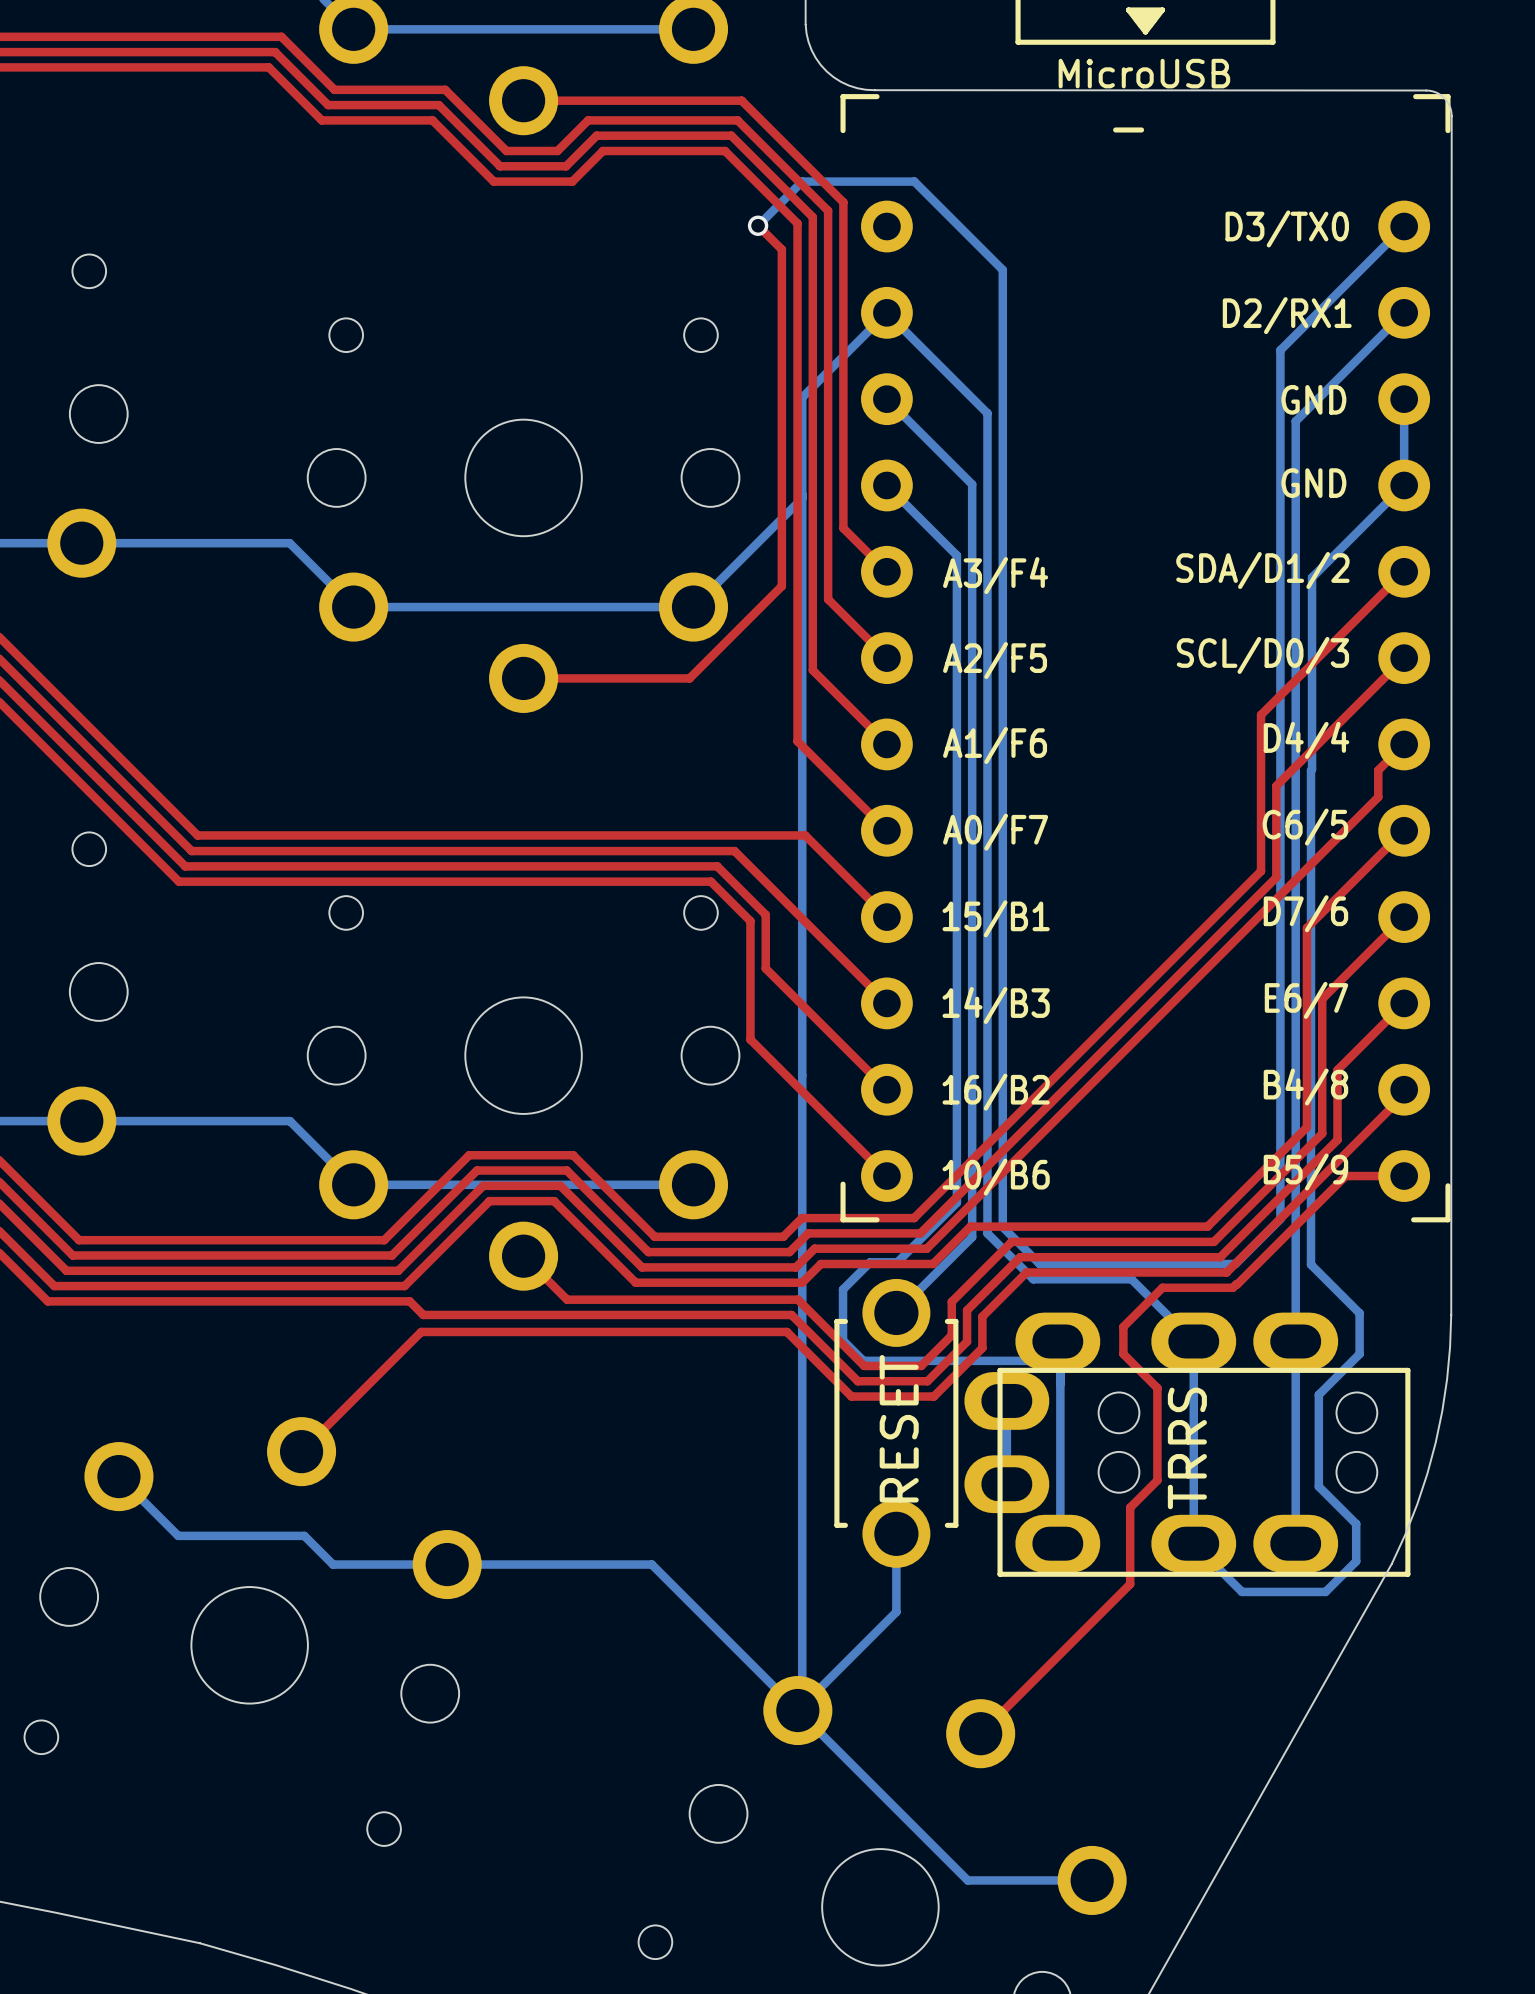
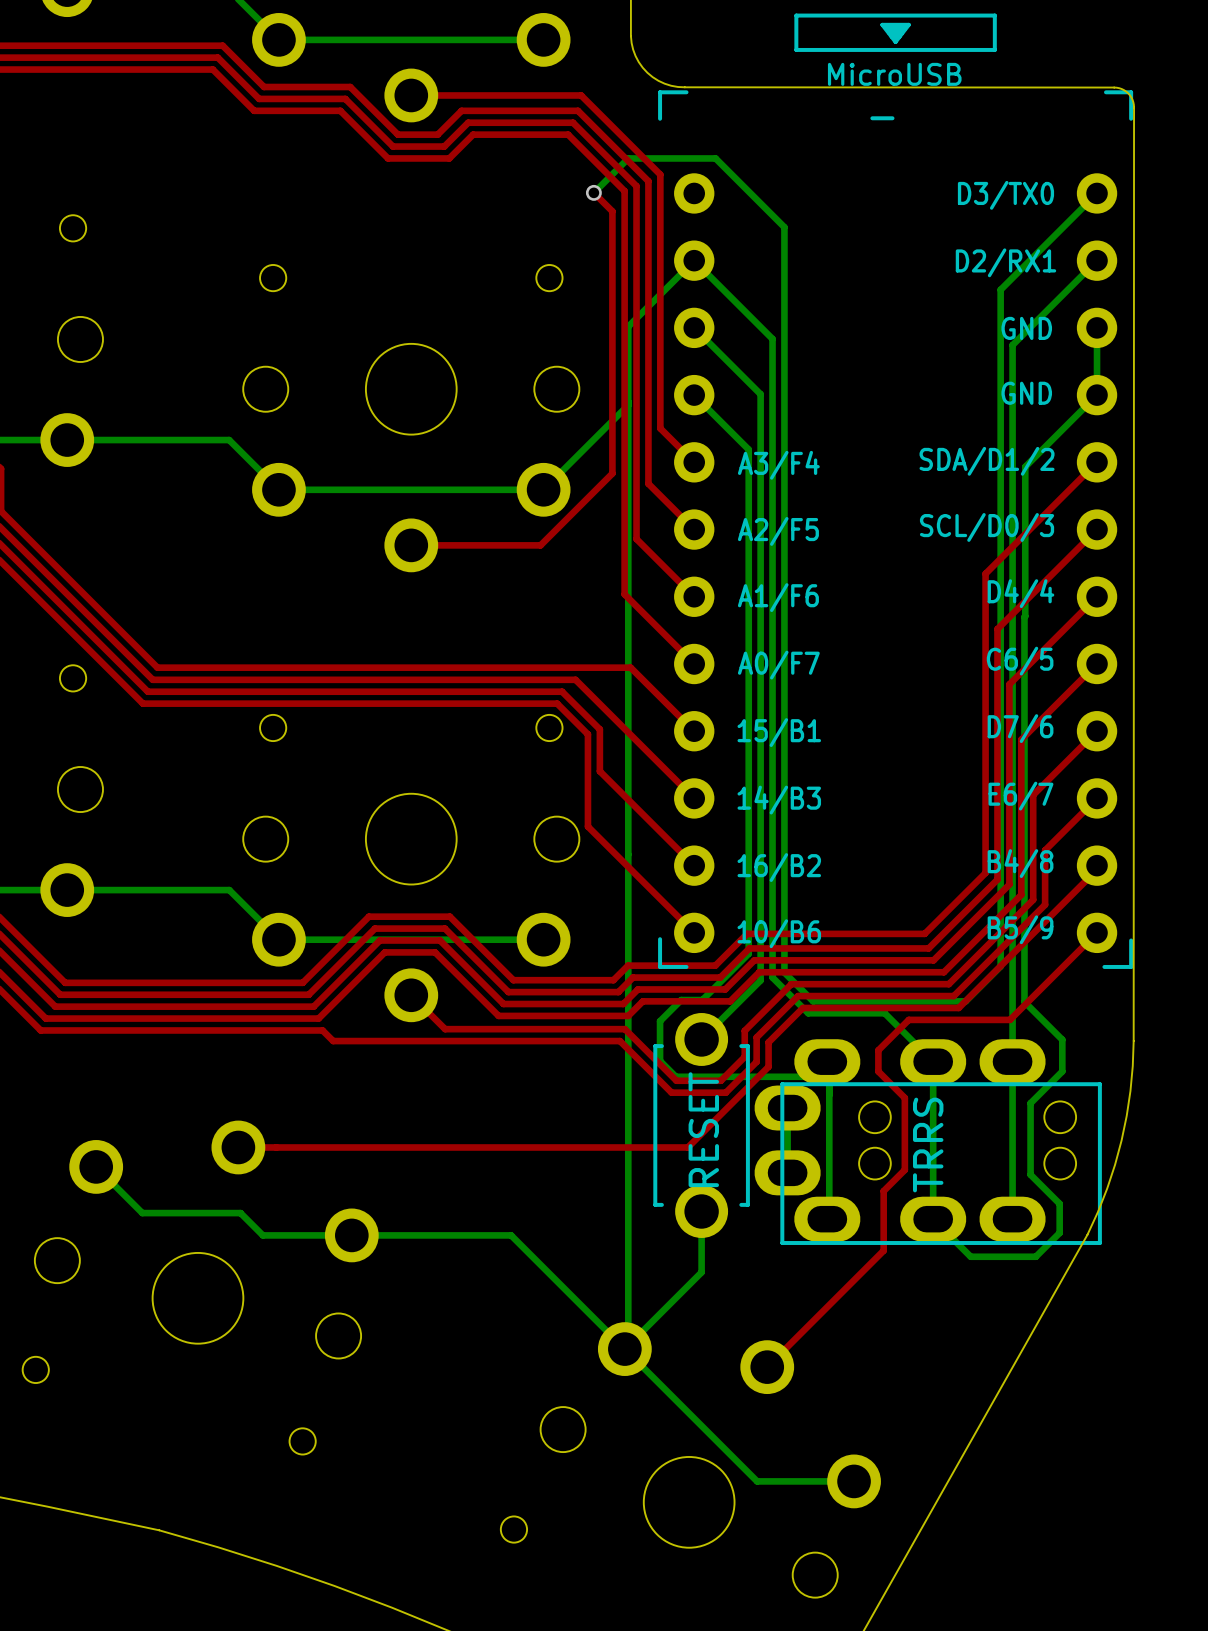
top track: (1378, 770) (1378, 797) (964, 1211) -> (1076, 616) (1009, 684) (1009, 884) (933, 960) (754, 960)
top track: (1261, 871) (954, 1177) -> (985, 695) (985, 873) (924, 933) (747, 933)
top track: (1276, 877) (957, 1196) -> (997, 700) (997, 879) (928, 948) (749, 948)
top track: (1404, 1176) (1345, 1176) (1232, 1287) -> (1097, 932) (1010, 1019) (963, 1019)
top track: (933, 1396) (851, 1396) (786, 1331) (421, 1331) (301, 1451) -> (730, 1104) (687, 1147) (238, 1147)

